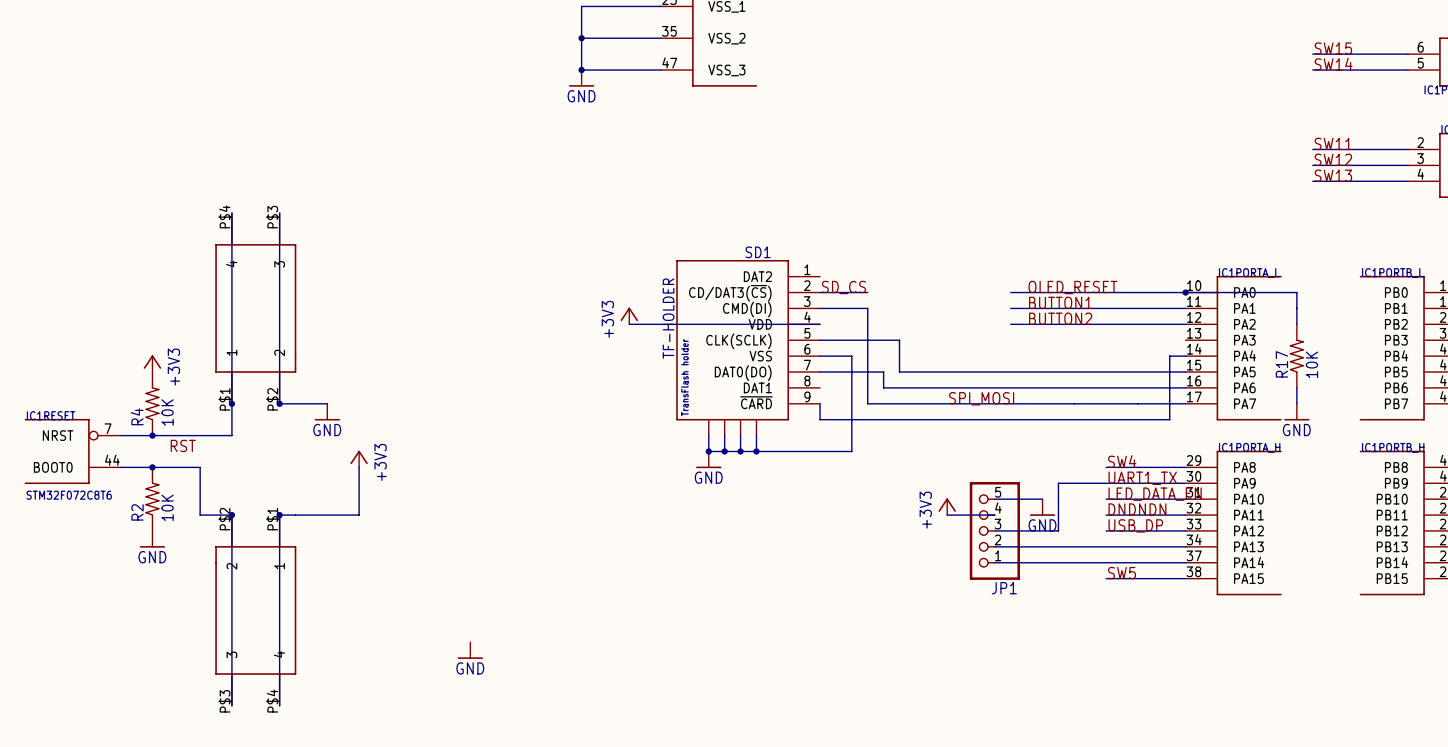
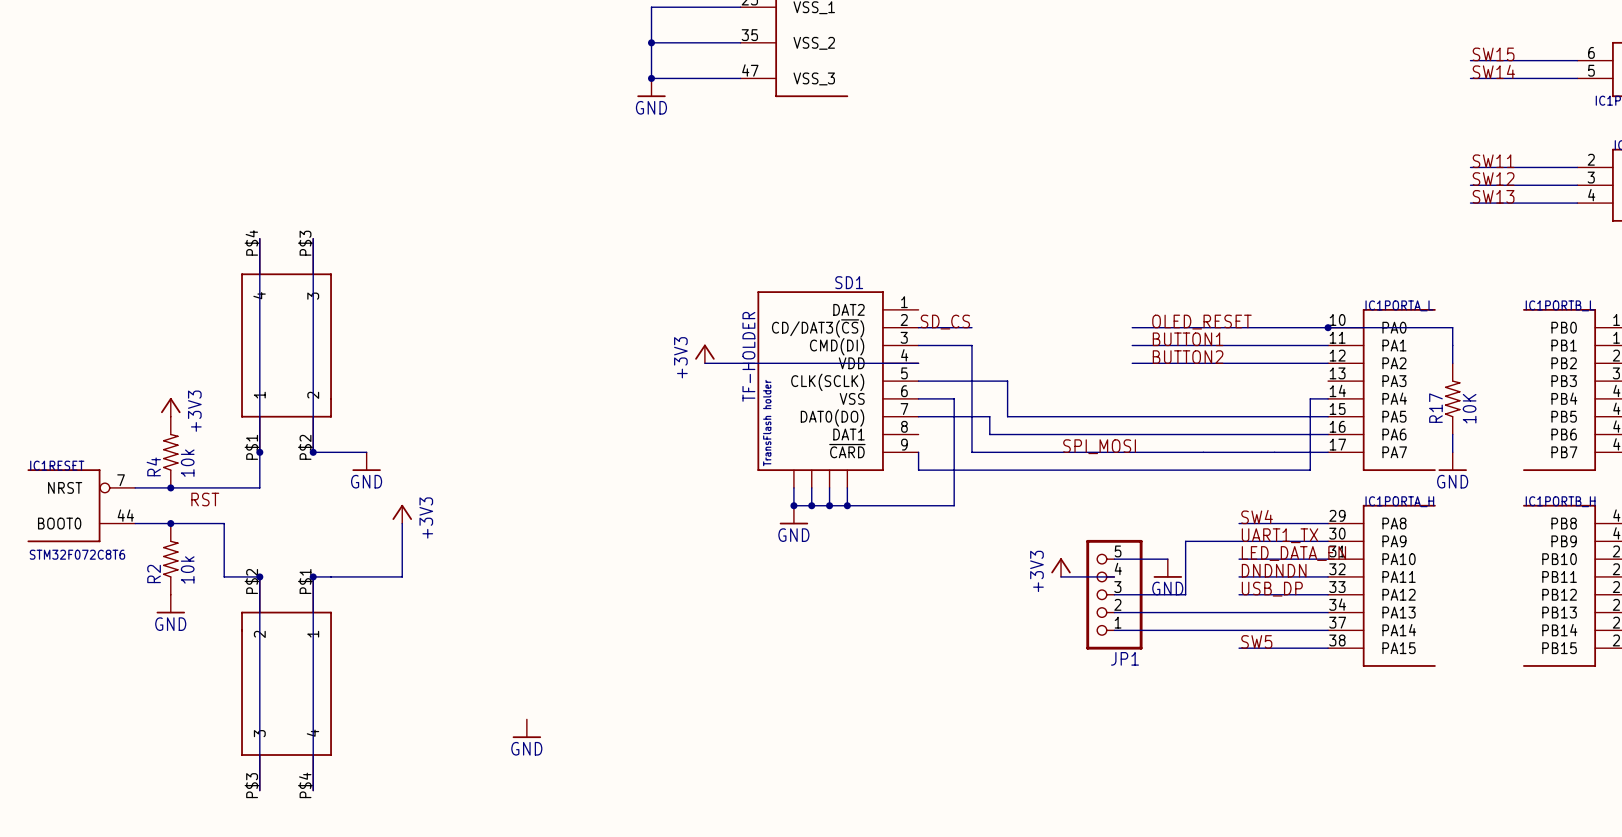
R4 value: 10K (167, 412) -> 10k (187, 463)
R2 value: 10K (167, 507) -> 10k (187, 569)

